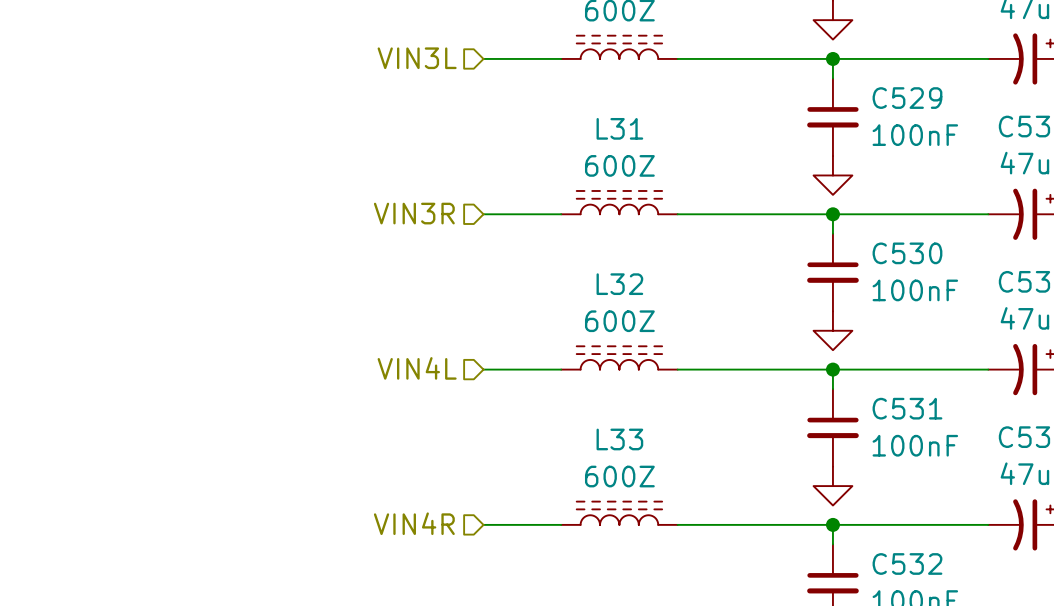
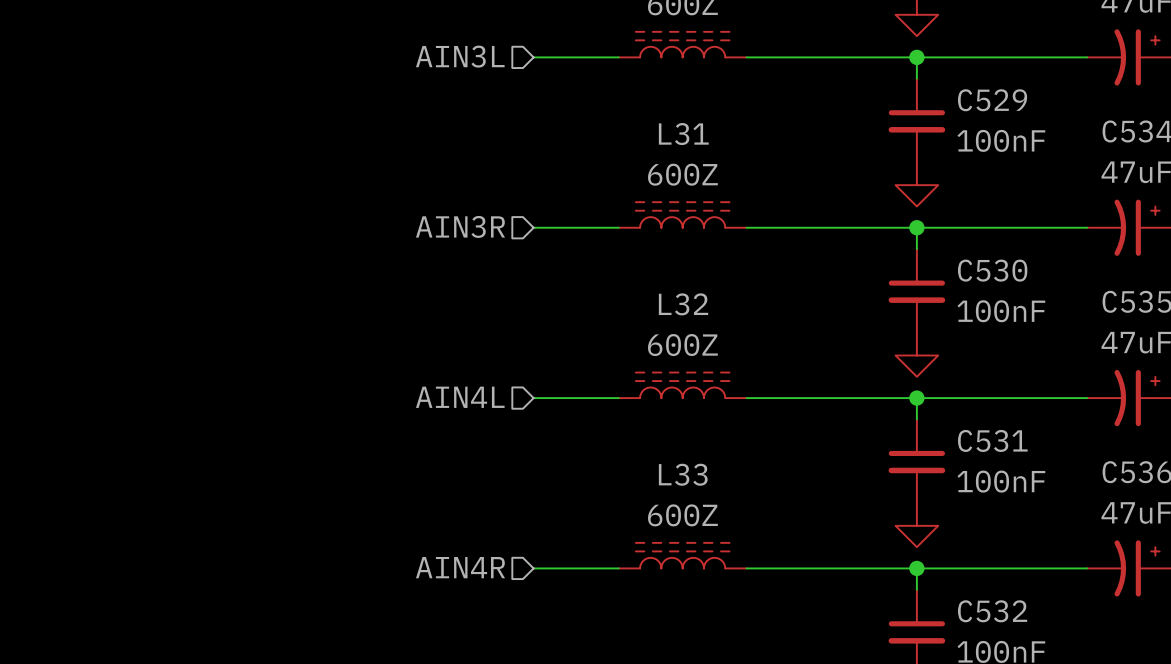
hierarchical label: VIN3L (417, 58) -> AIN3L (460, 56)
hierarchical label: VIN3R (414, 213) -> AIN3R (460, 226)
hierarchical label: VIN4L (417, 368) -> AIN4L (460, 397)
hierarchical label: VIN4R (414, 523) -> AIN4R (460, 567)

